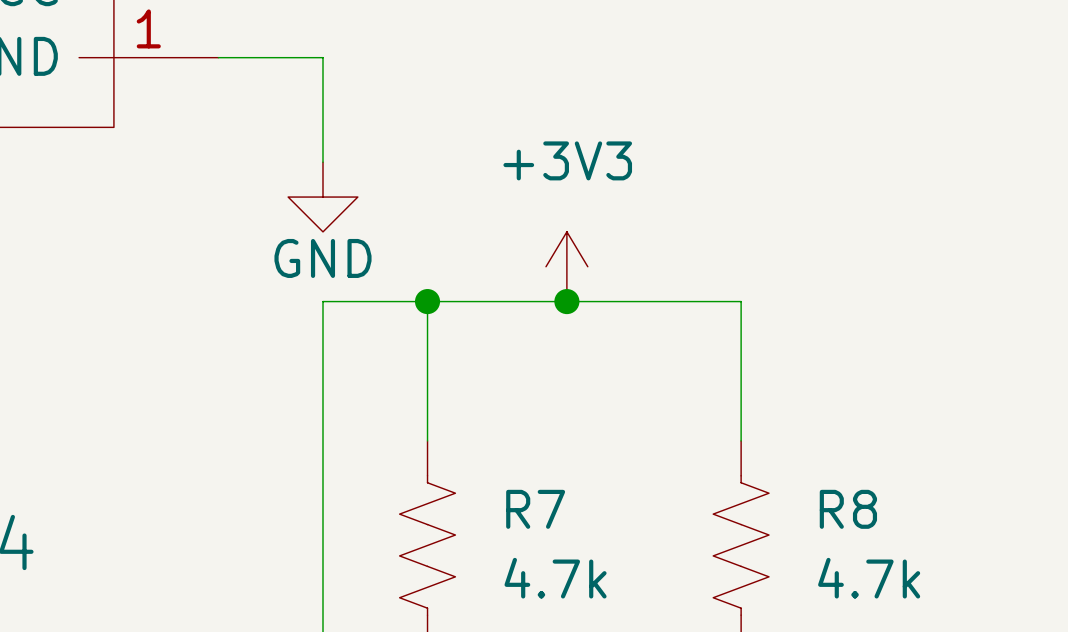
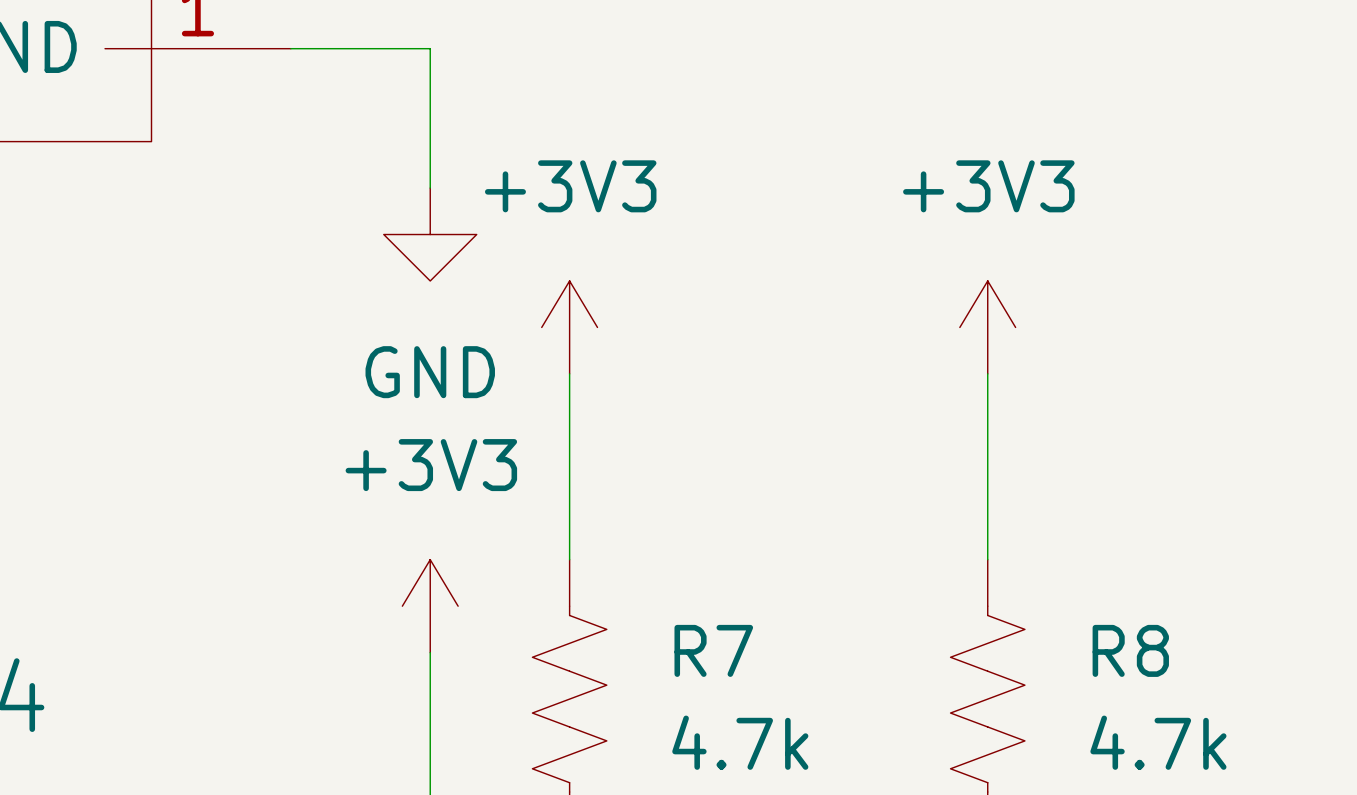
power symbol text position: GND (322, 258) -> GND (430, 372)
power symbol: none -> +3V3 (569, 327)
power symbol: +3V3 (566, 266) -> none
power symbol: none -> +3V3 (987, 327)
junction: (427, 301) -> none
junction: (566, 301) -> none
wire: (741, 301) (322, 301) (322, 510) -> none
power symbol: none -> +3V3 (430, 606)

